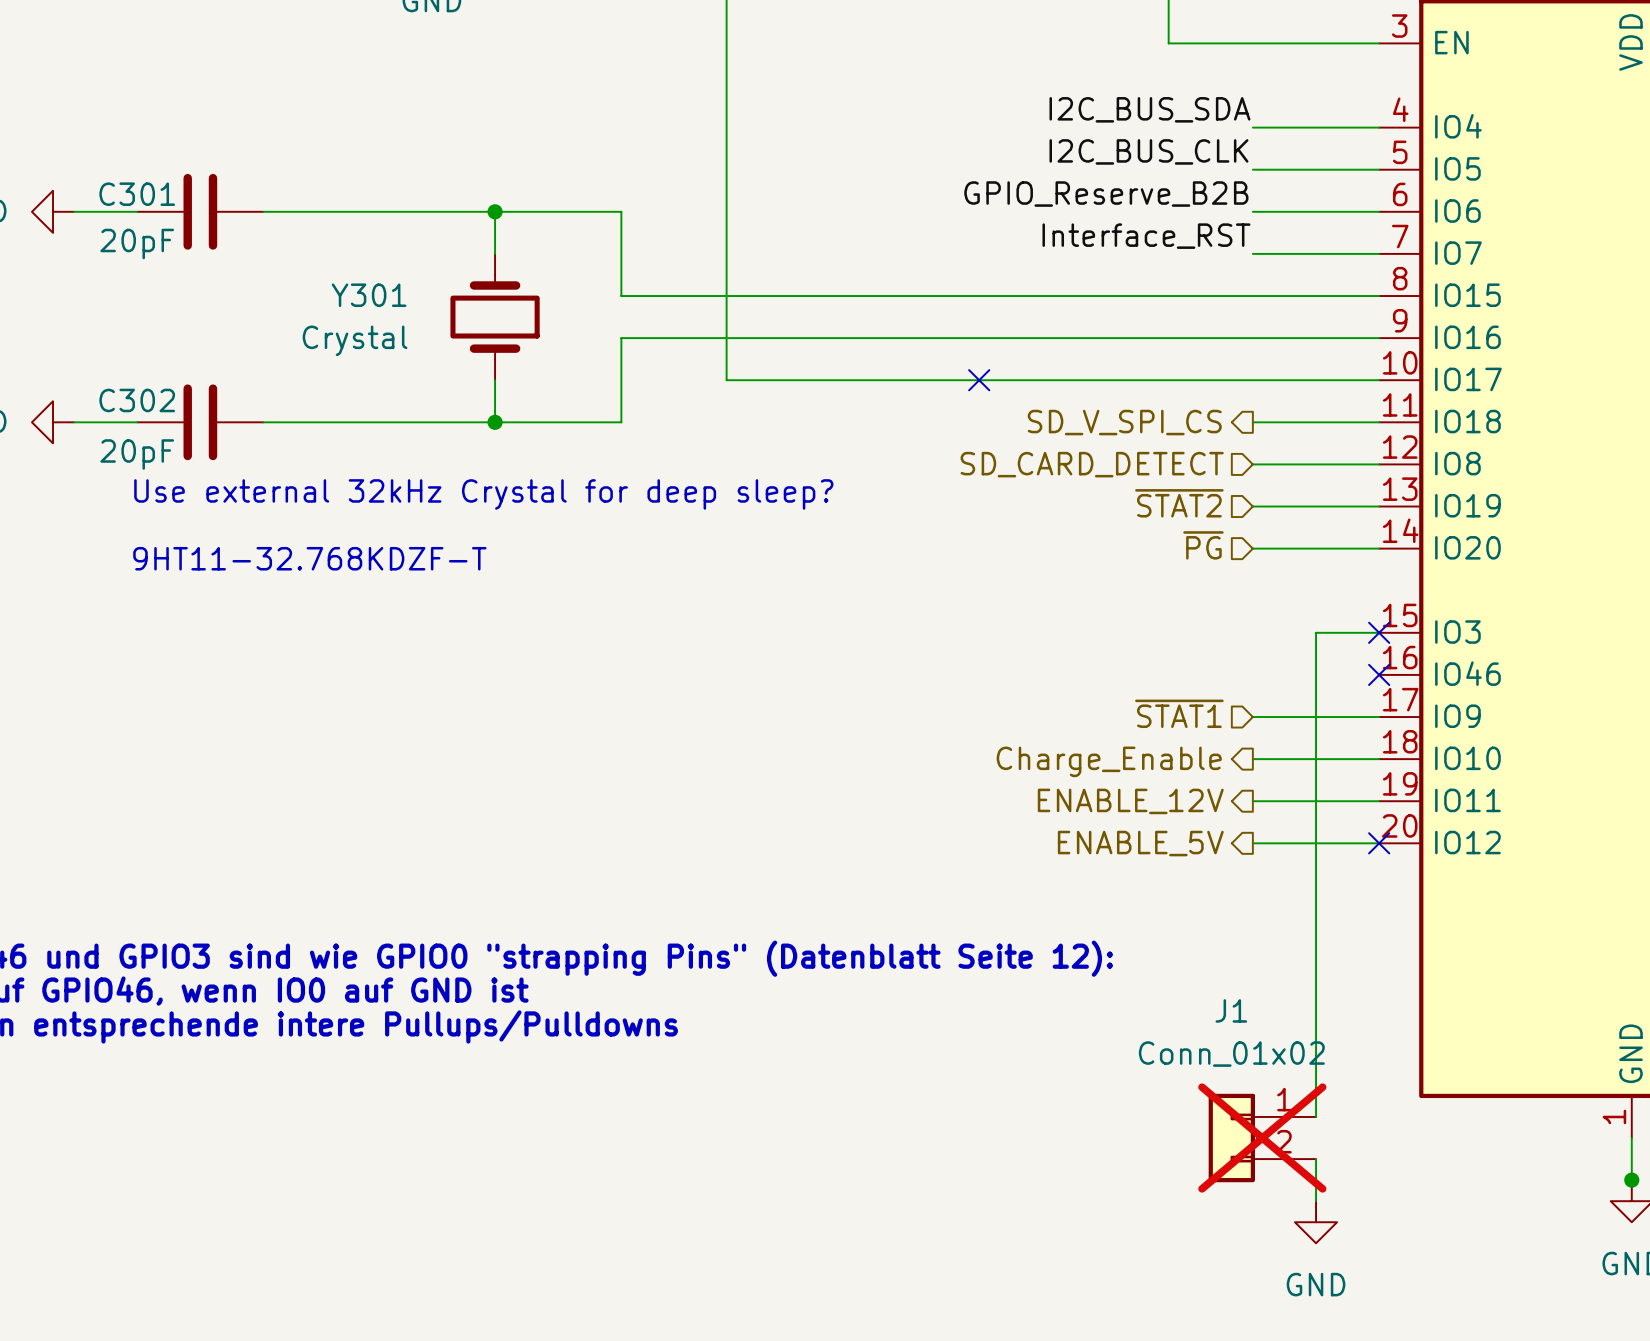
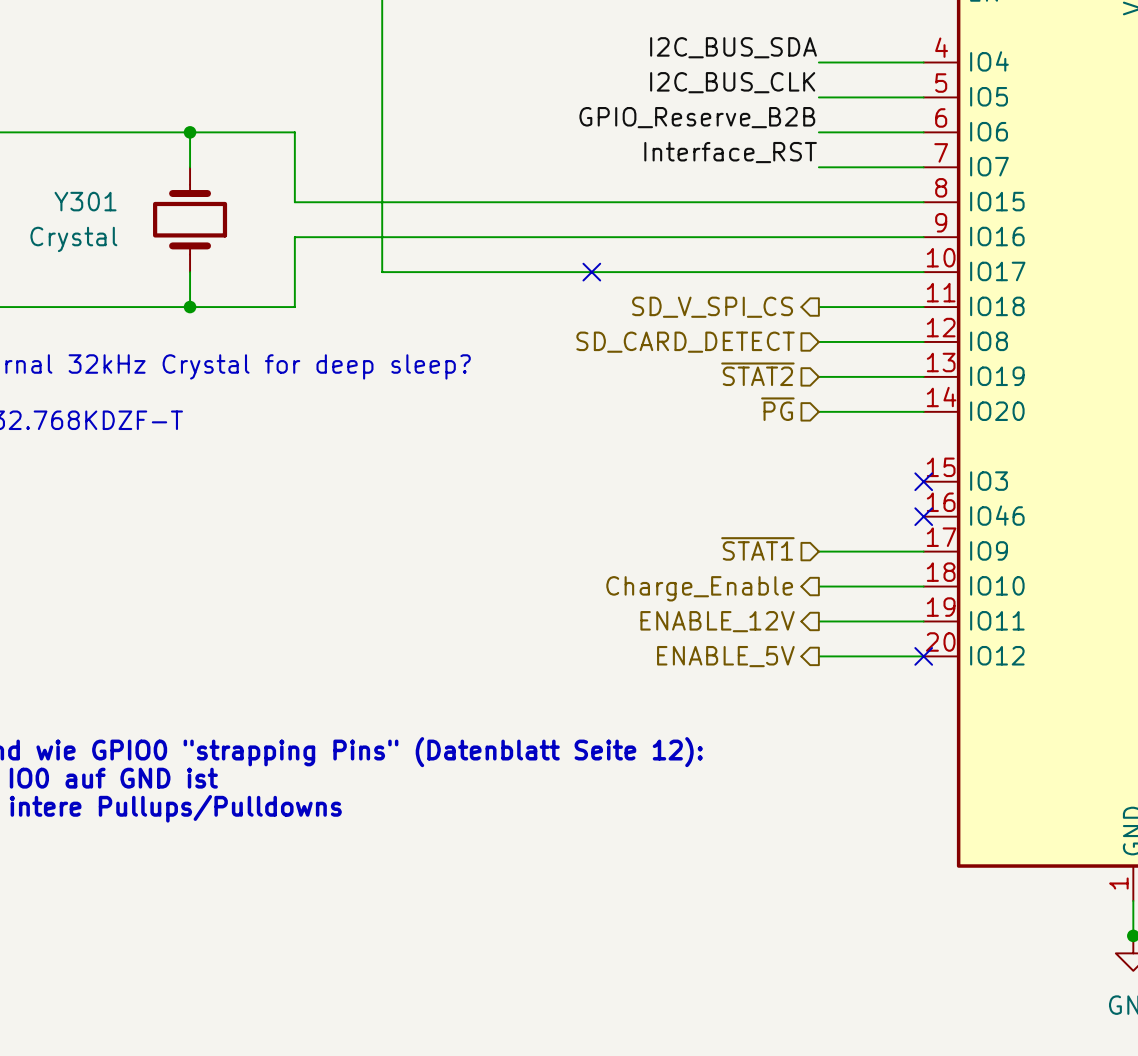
wire: (1379, 632) (1316, 632) (1316, 1116) -> none
J1: Conn_01x02 (1262, 1138) -> none
wire: (1316, 1159) (1316, 1201) -> none
power symbol: GND (1316, 1222) -> none

